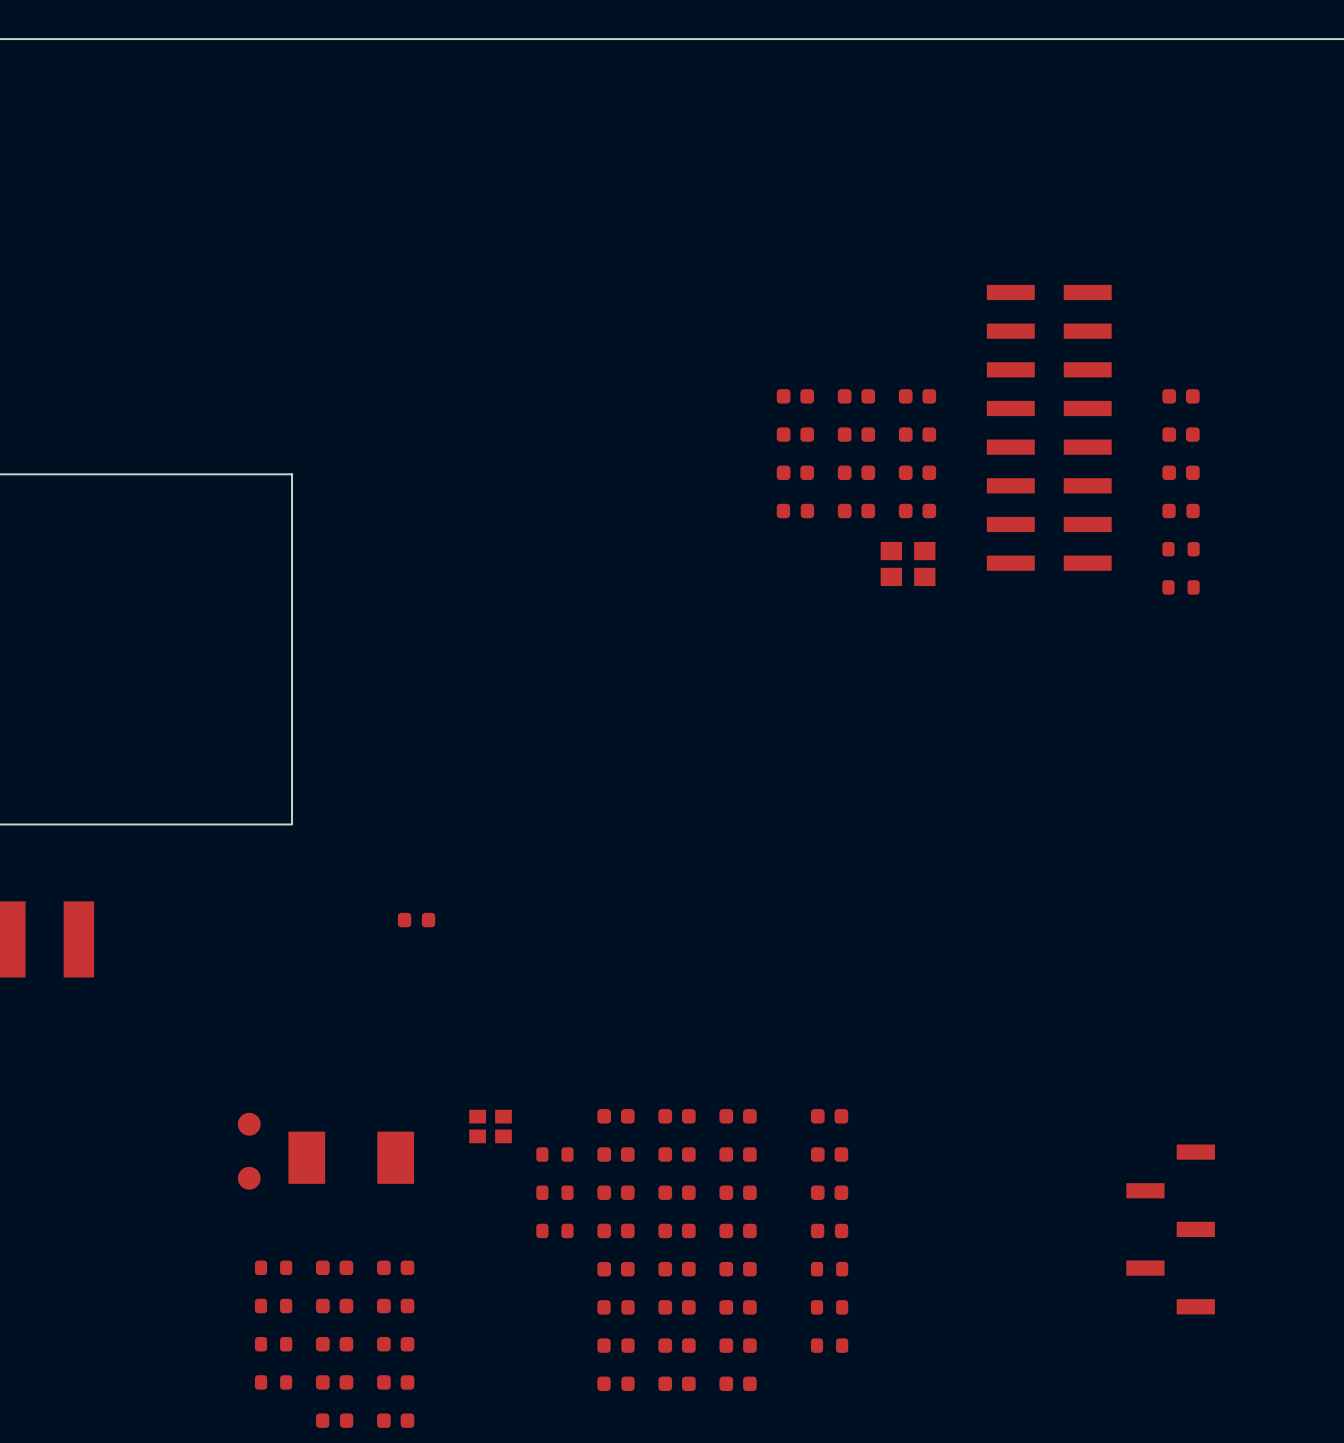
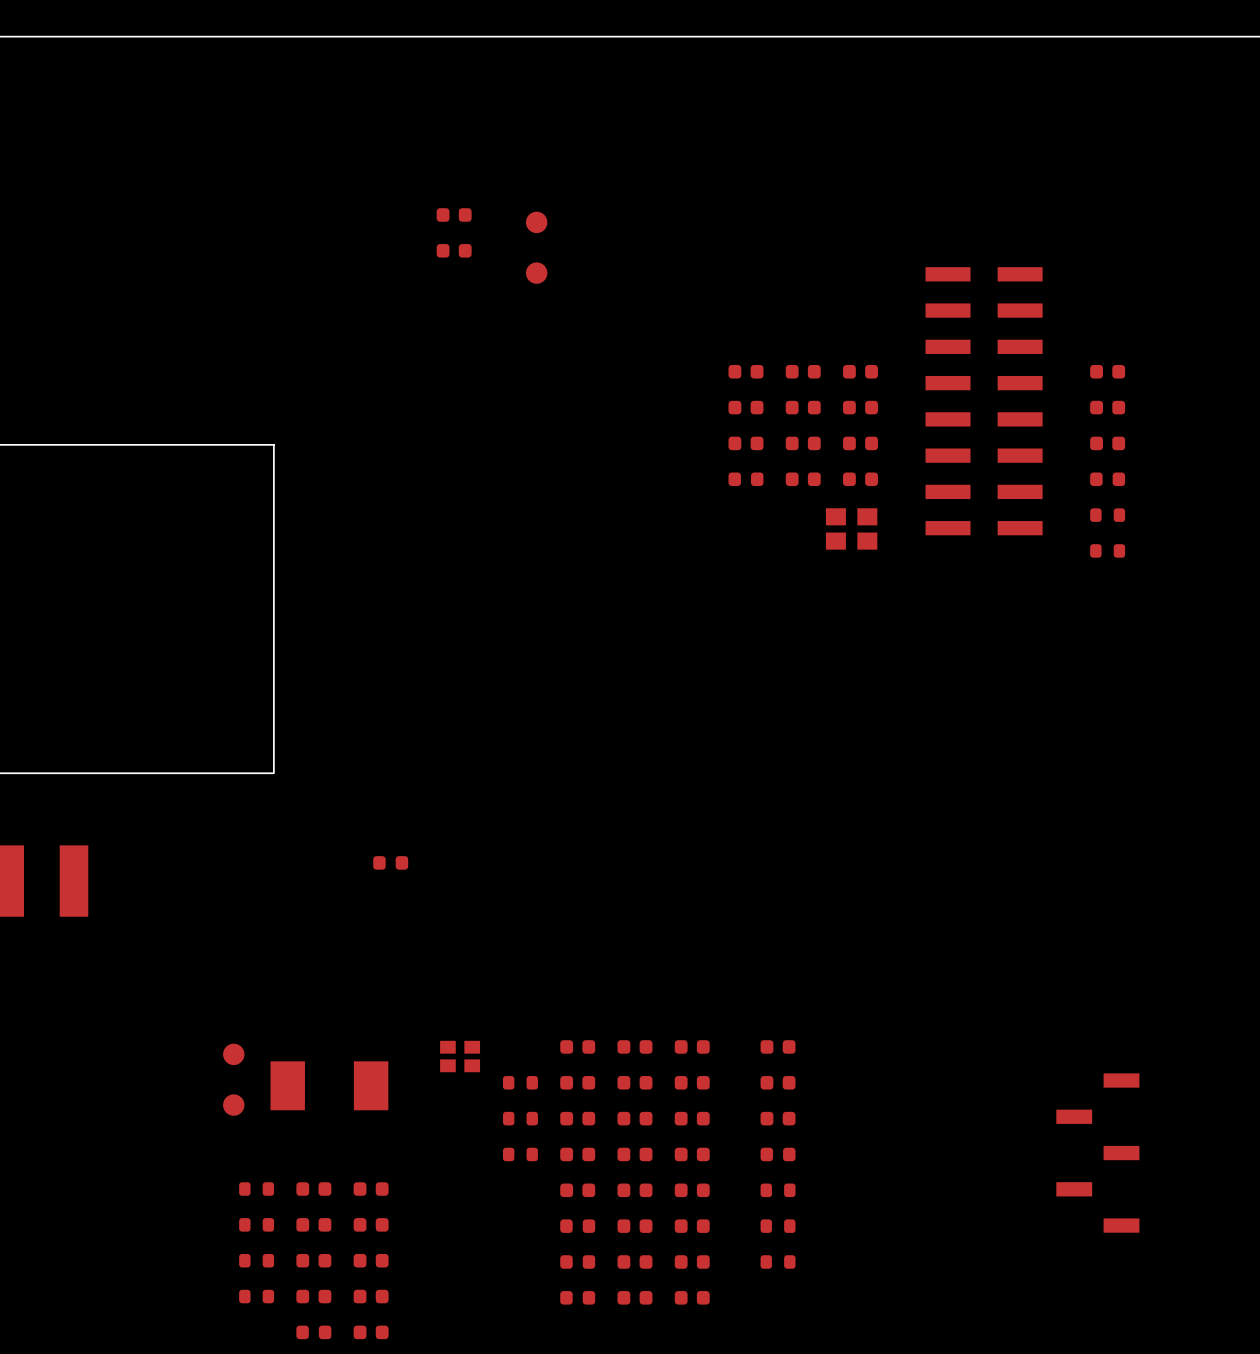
part: none -> (454, 214)
part: none -> (536, 222)
part: none -> (454, 250)
part: none -> (536, 273)

